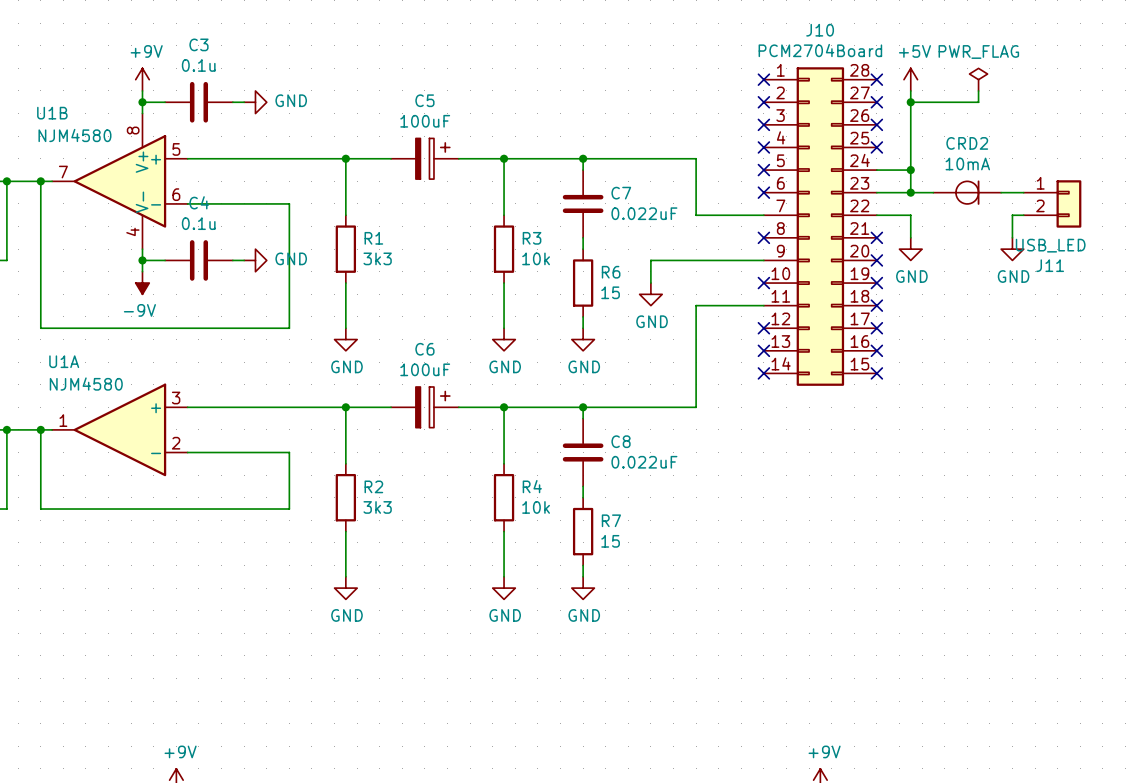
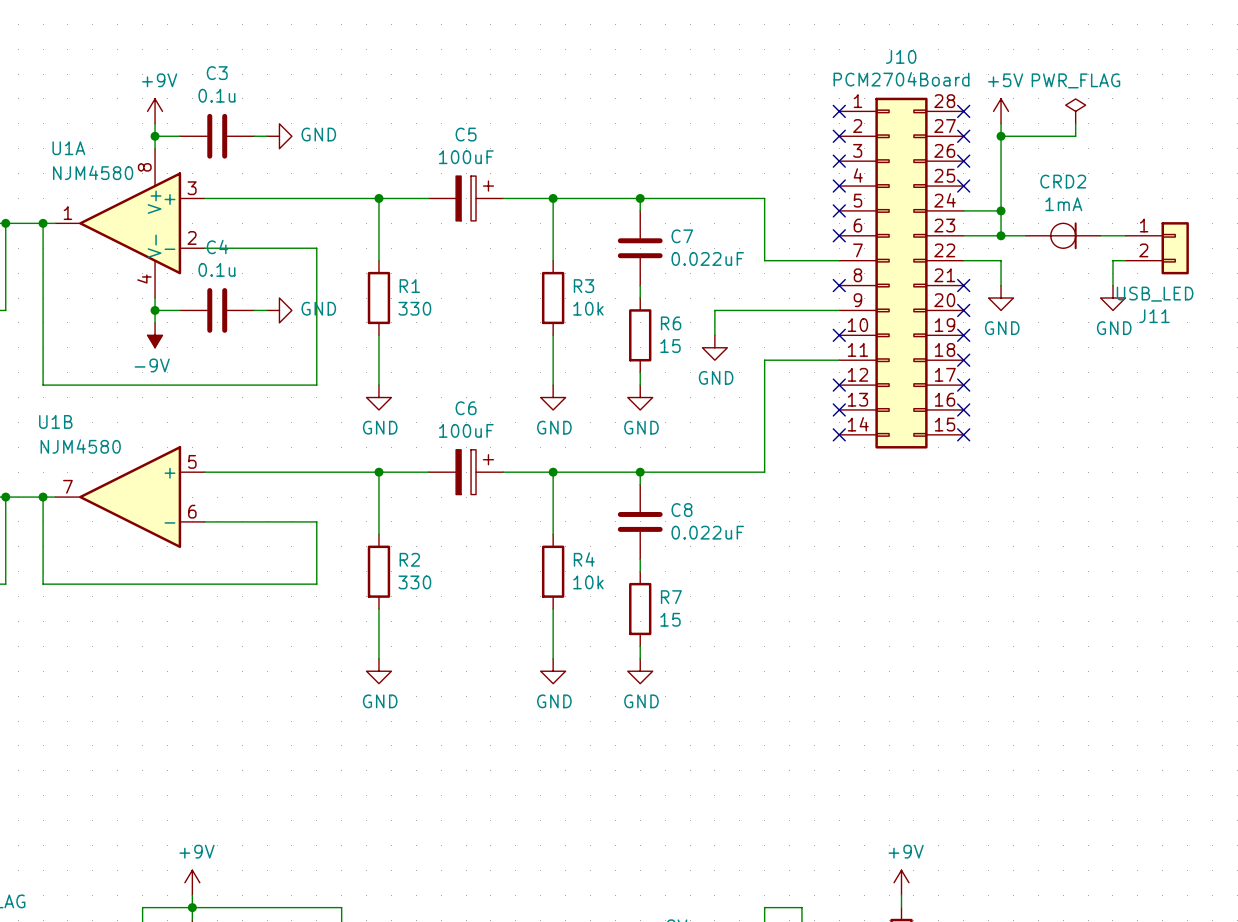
CRD2 value: 10mA (967, 163) -> 1mA (1063, 204)
U1B position: (119, 181) -> (130, 497)
R1 value: 3k3 (377, 258) -> 330 (414, 308)
U1A position: (119, 429) -> (130, 223)
R2 value: 3k3 (377, 507) -> 330 (414, 582)

